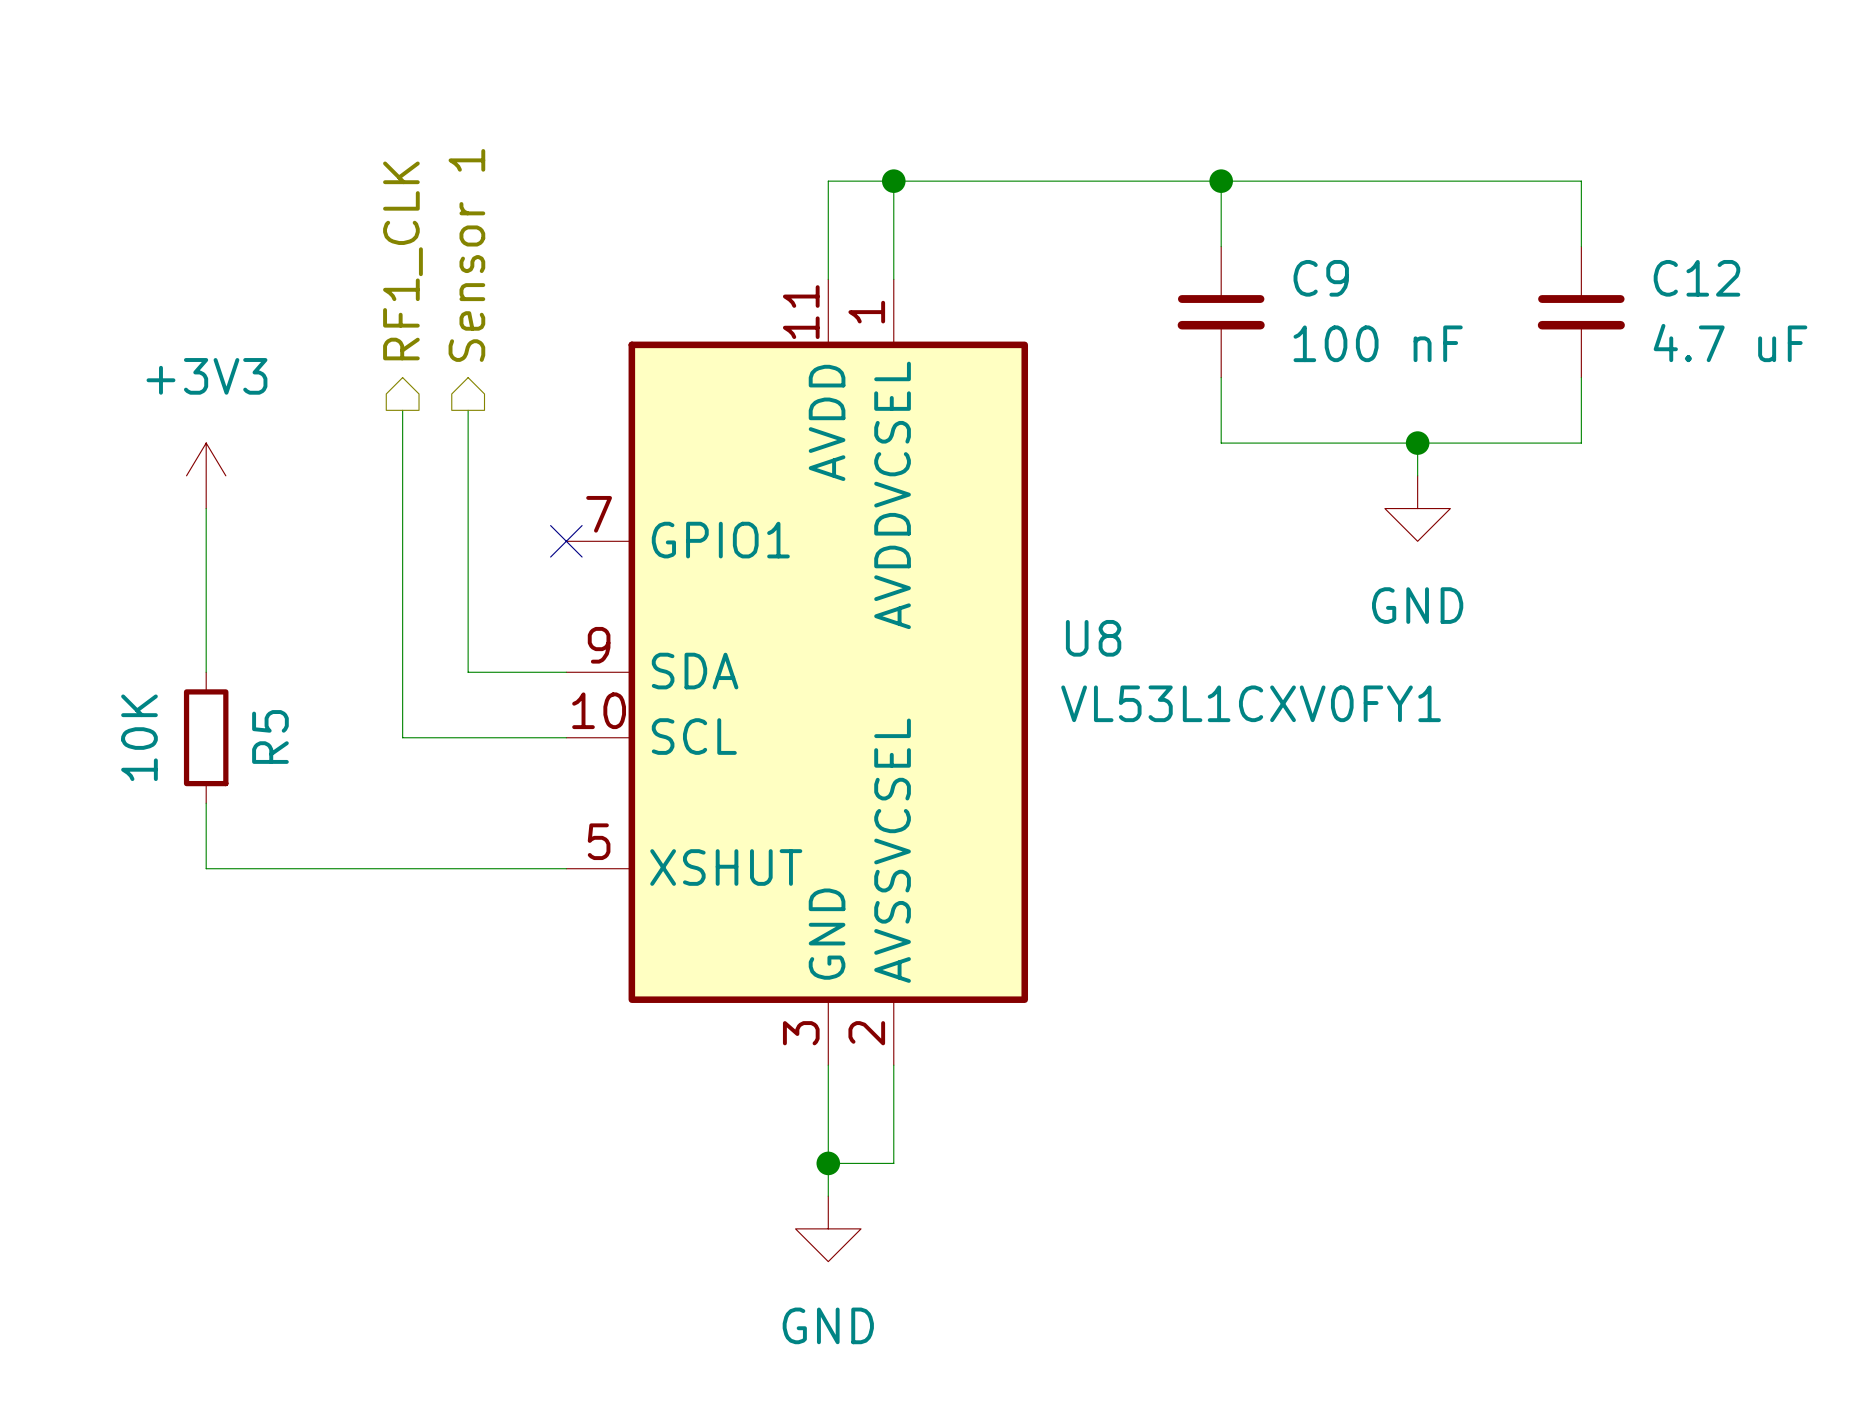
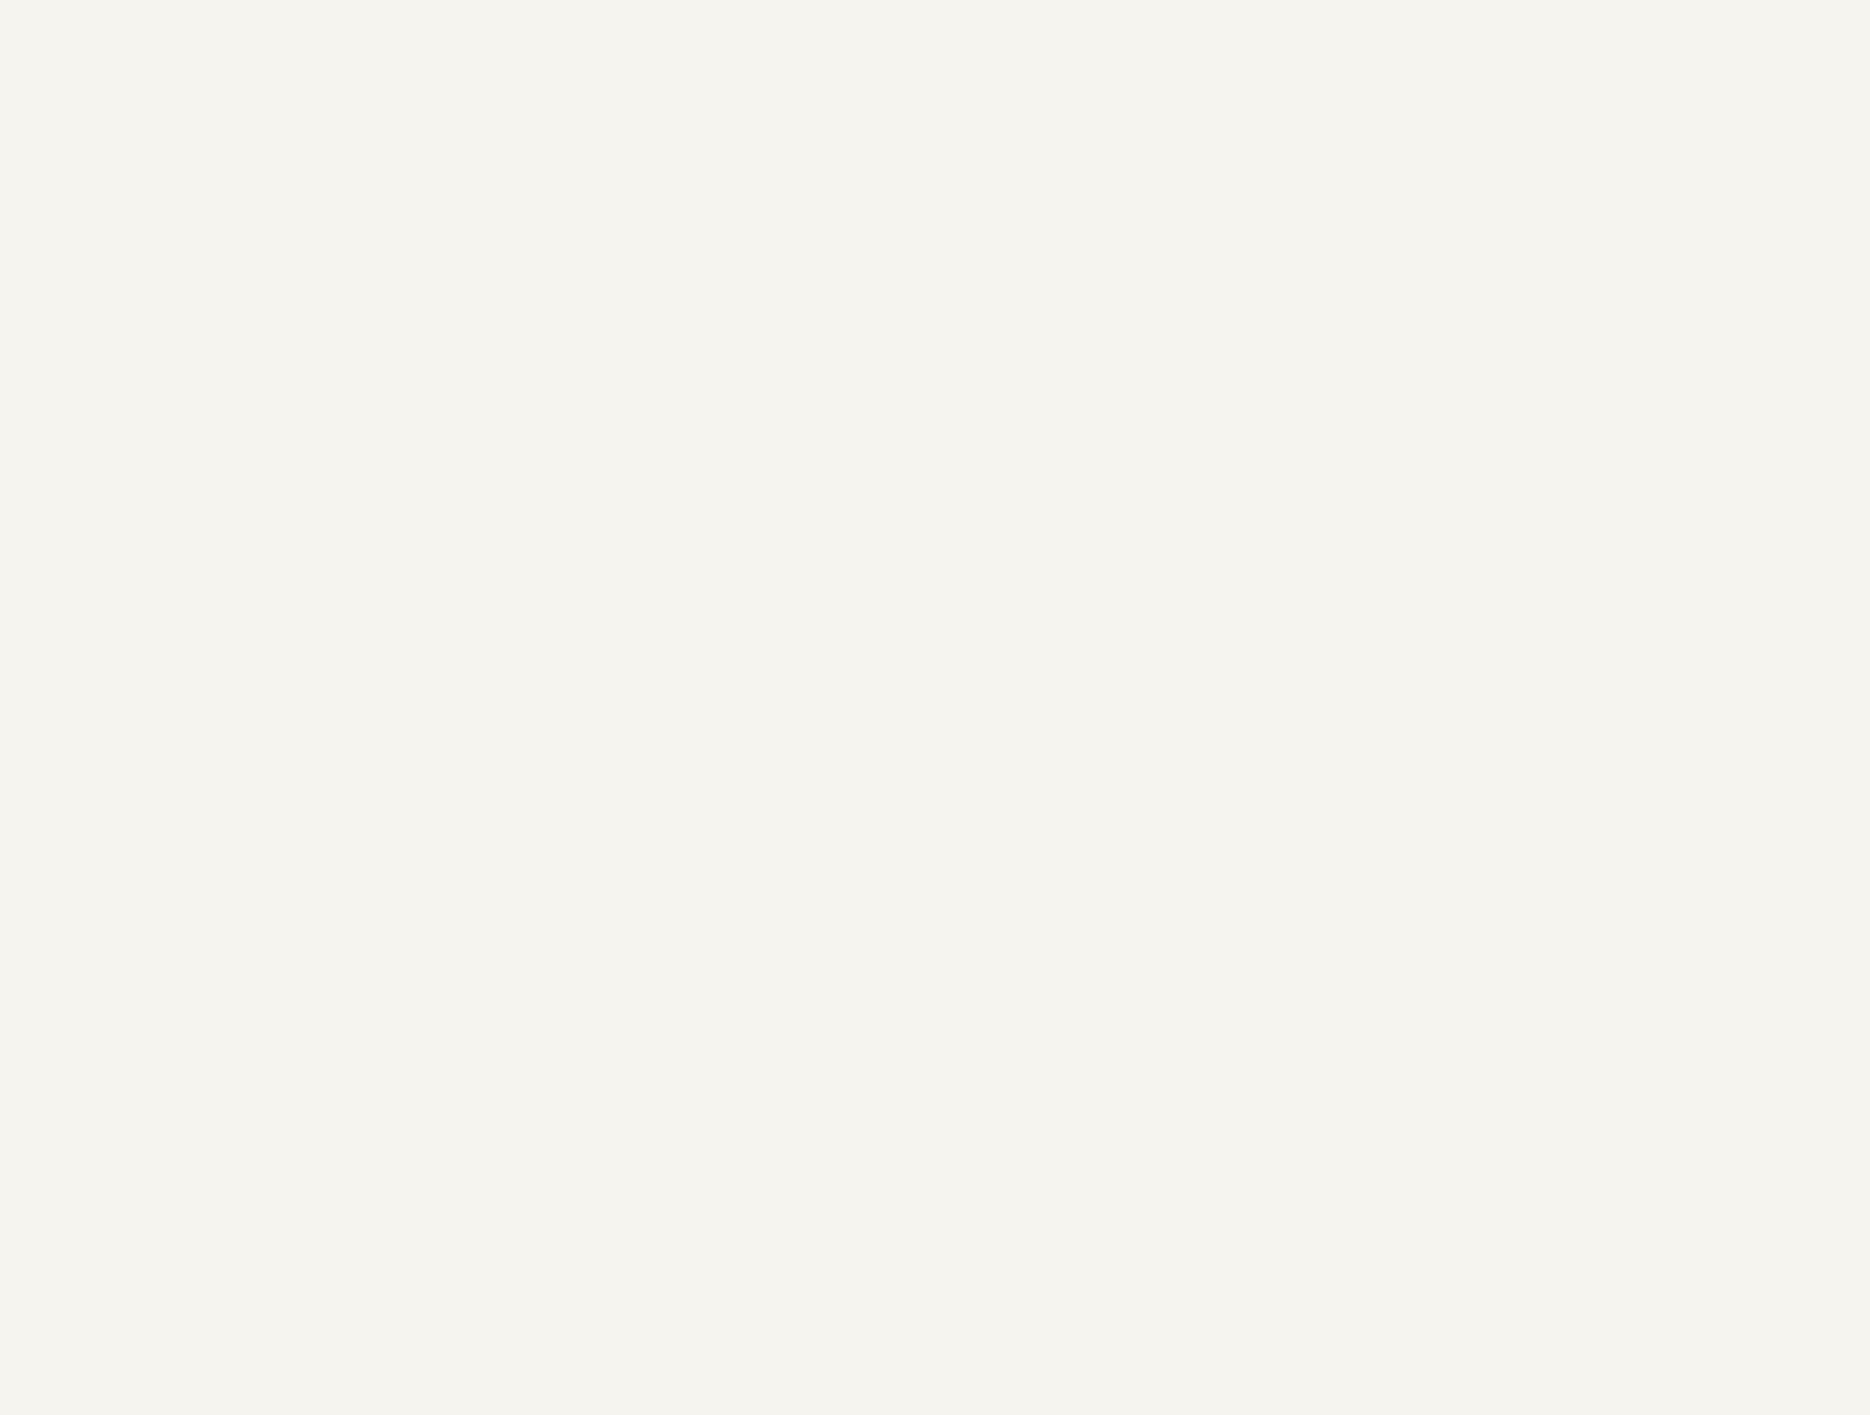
wire: (893, 181) (893, 279) -> none
junction: (893, 181) -> none
wire: (1221, 181) (1221, 246) -> none
junction: (1221, 181) -> none
wire: (1581, 246) (1581, 181) (828, 181) (828, 279) -> none
hierarchical label: Sensor 1 (466, 255) -> none
hierarchical label: RF1_CLK (402, 260) -> none
C9: 100 nF (1221, 312) -> none
C12: 4.7 uF (1581, 312) -> none
wire: (1221, 377) (1221, 443) (1581, 443) (1581, 377) -> none
wire: (402, 410) (402, 737) (566, 737) -> none
wire: (468, 410) (468, 672) (566, 672) -> none
wire: (1417, 443) (1417, 475) -> none
junction: (1417, 443) -> none
power symbol: +3V3 (206, 475) -> none
wire: (206, 508) (206, 672) -> none
power symbol: GND (1417, 508) -> none
no-connect mark: (566, 541) -> none
U8: VL53L1CXV0FY1 (797, 672) -> none
R5: 10K (206, 737) -> none
wire: (206, 803) (206, 868) (566, 868) -> none
wire: (828, 1065) (828, 1196) -> none
wire: (893, 1065) (893, 1163) (828, 1163) -> none
junction: (828, 1163) -> none
power symbol: GND (828, 1228) -> none

